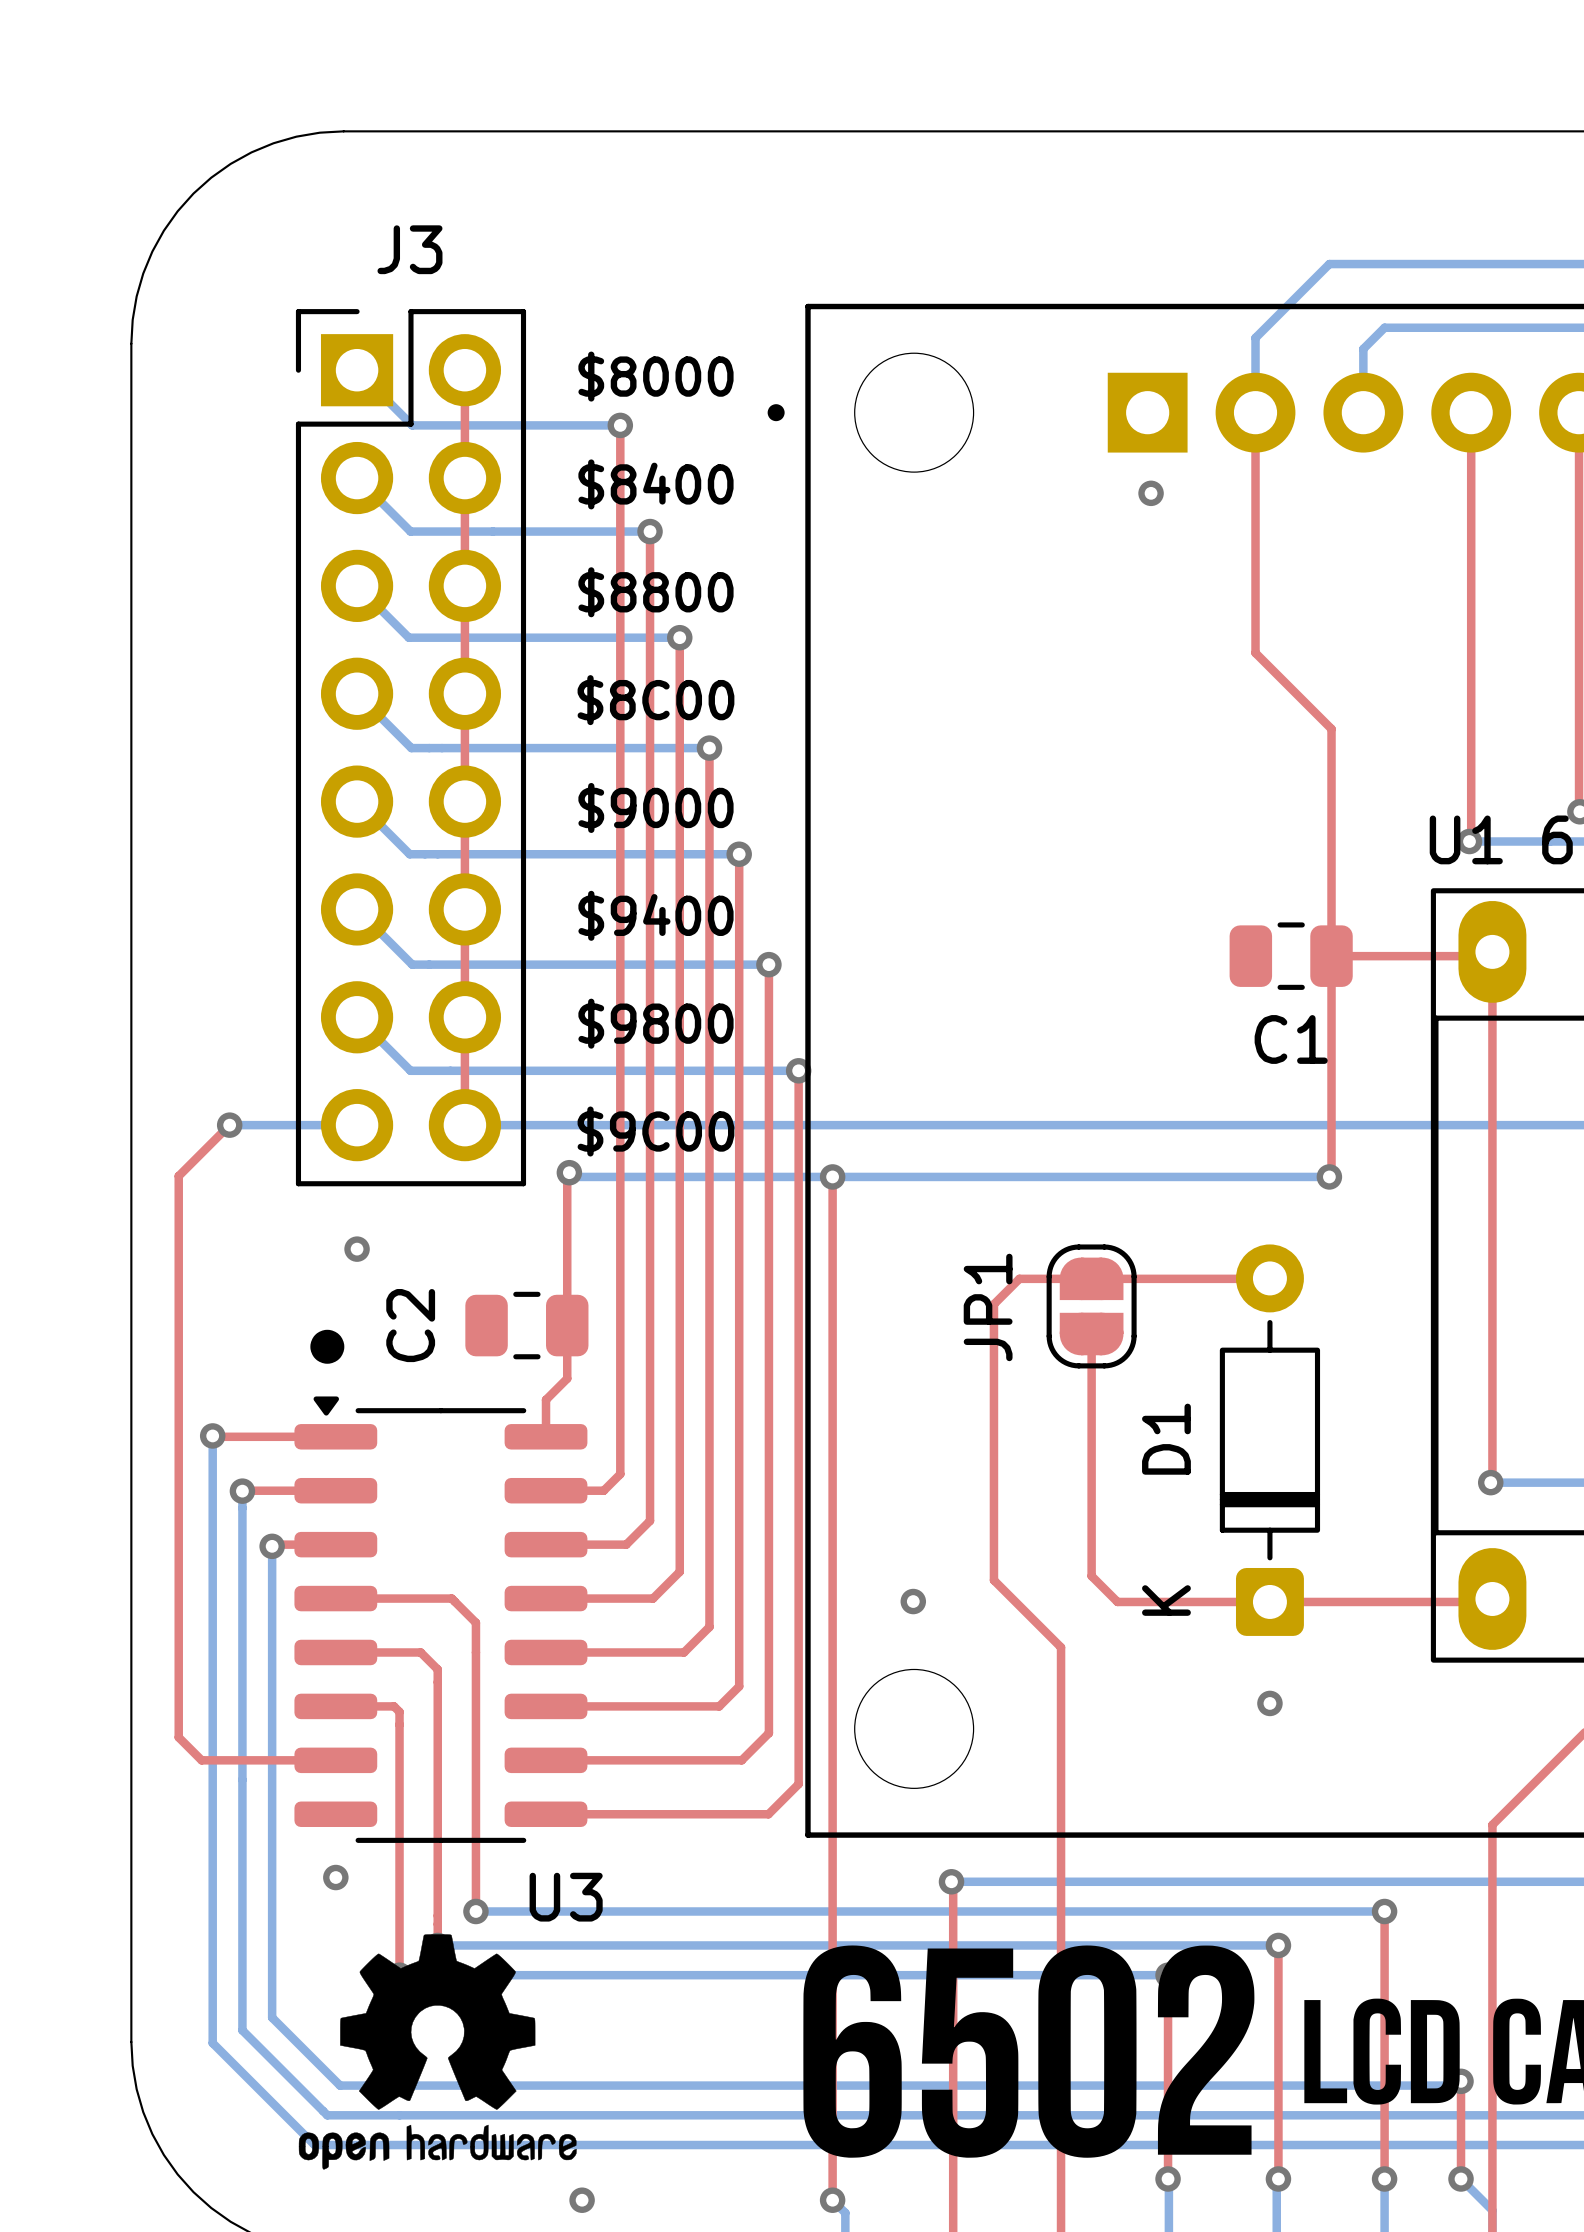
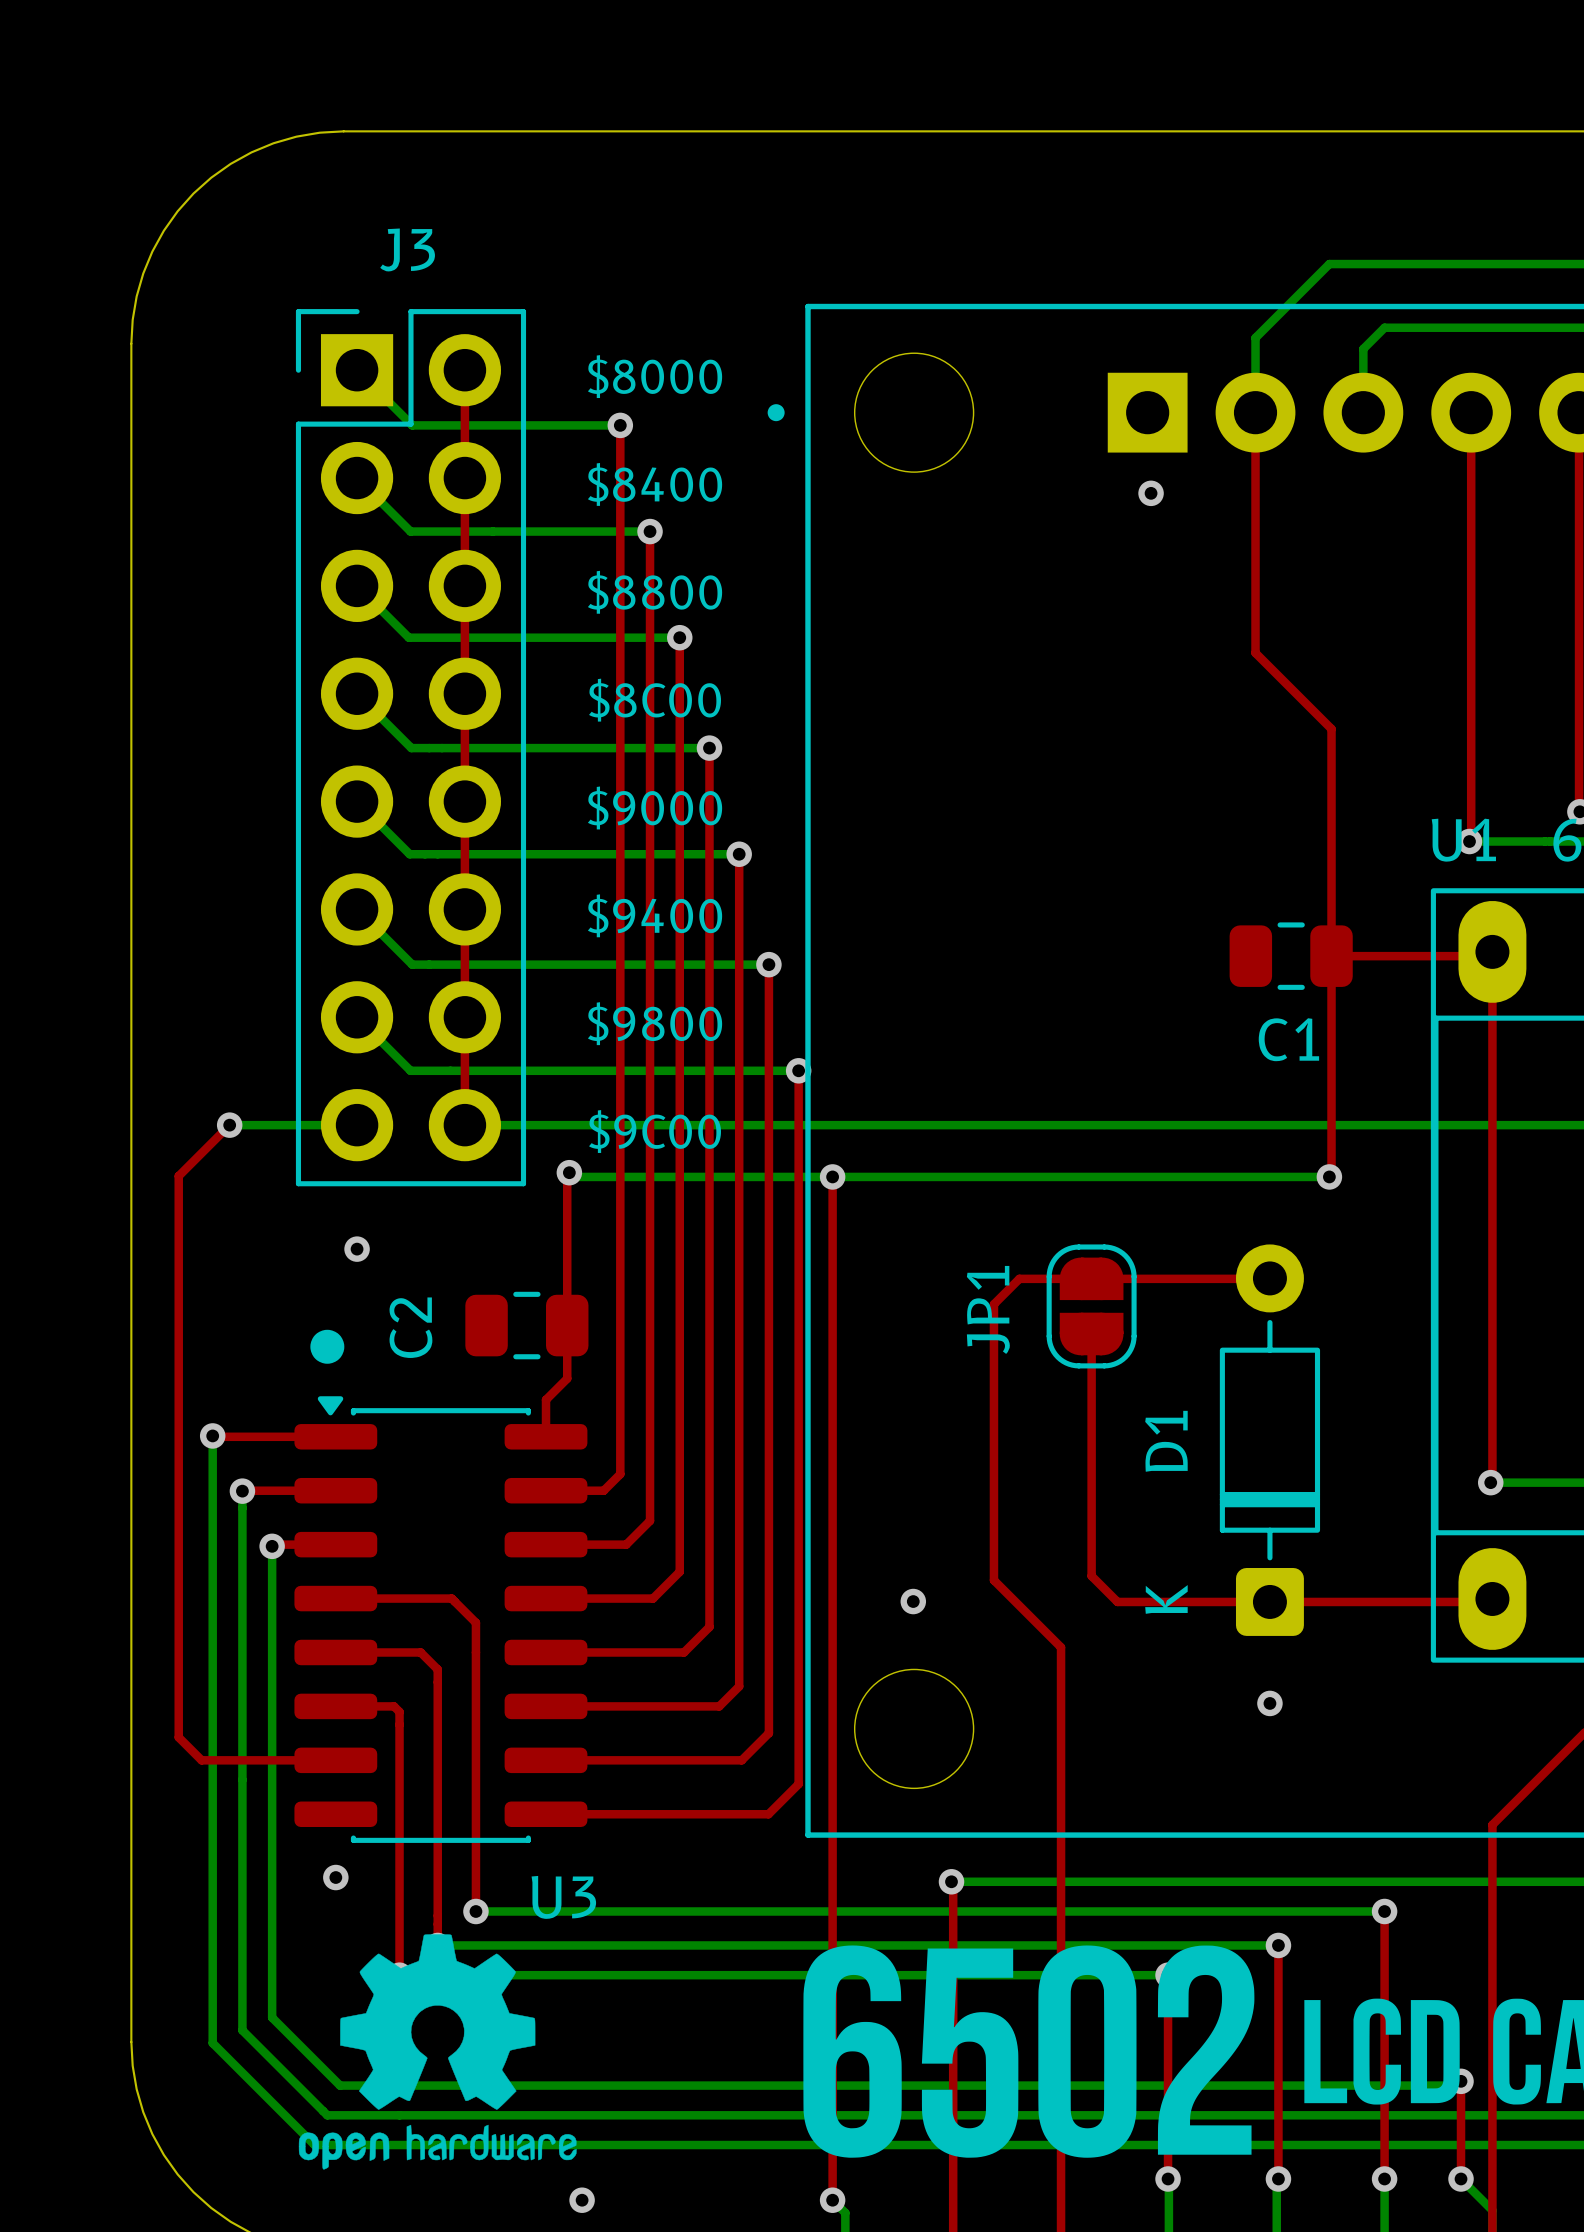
U3 footprint: [294, 1396, 588, 1843] -> [294, 1396, 588, 1843]

